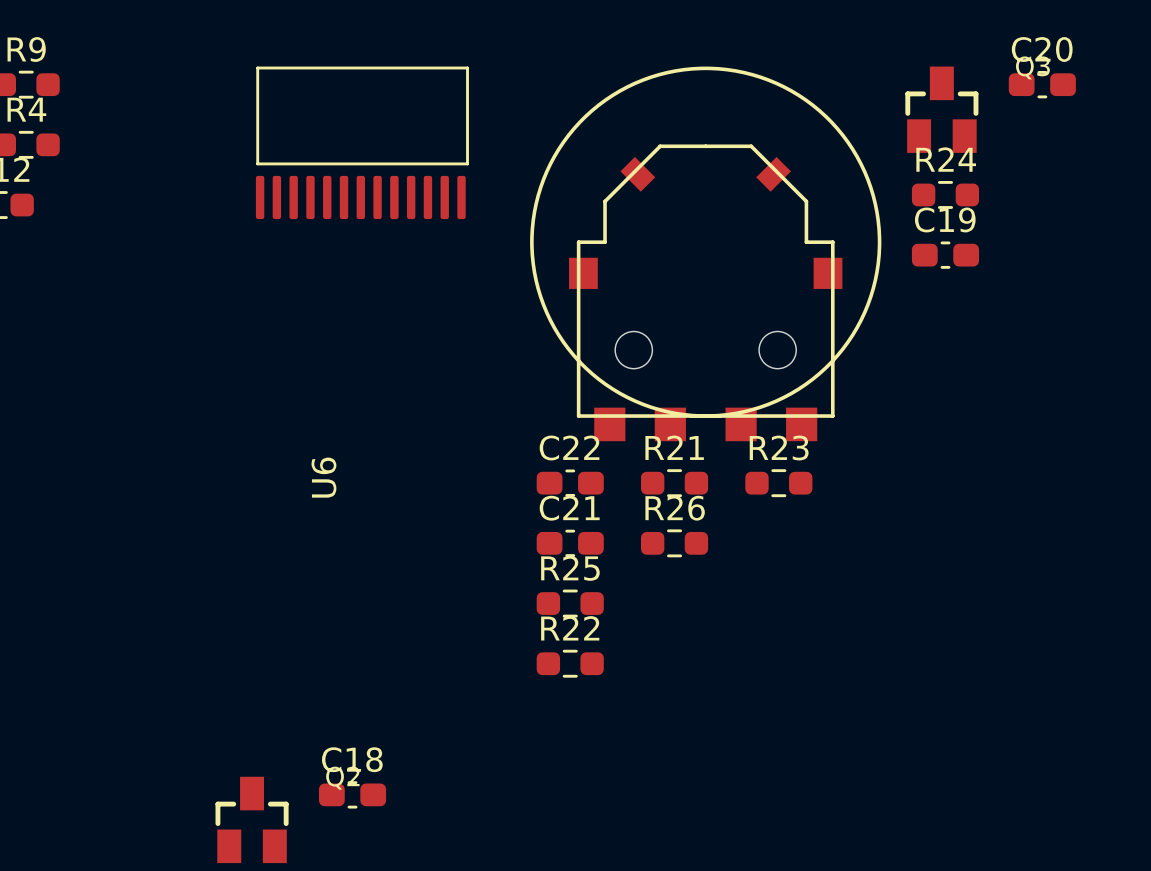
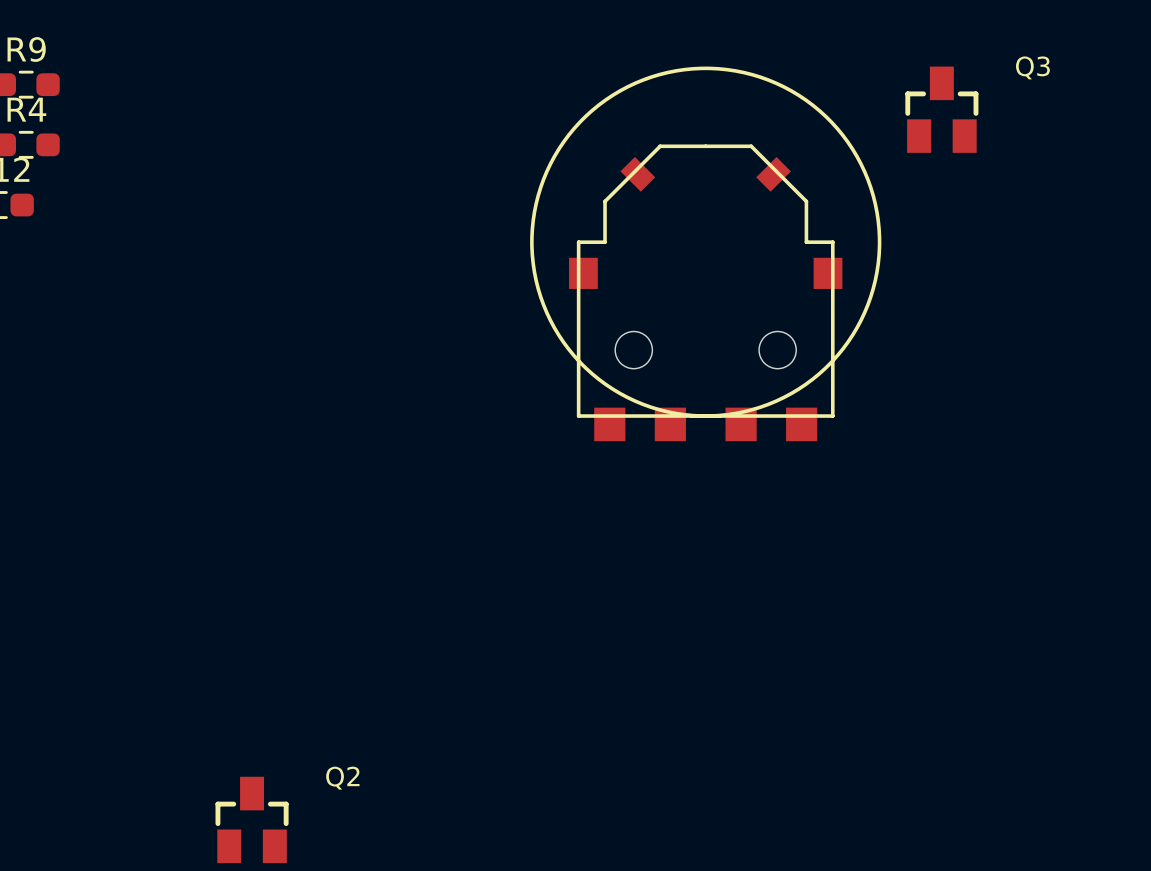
C20: (1042, 84) -> none
U6: (362, 142) -> none
R24: (945, 194) -> none
C19: (945, 255) -> none
C22: (570, 483) -> none
R21: (674, 483) -> none
R23: (778, 483) -> none
C21: (570, 543) -> none
R26: (674, 543) -> none
R25: (570, 603) -> none
R22: (570, 663) -> none
C18: (352, 794) -> none

